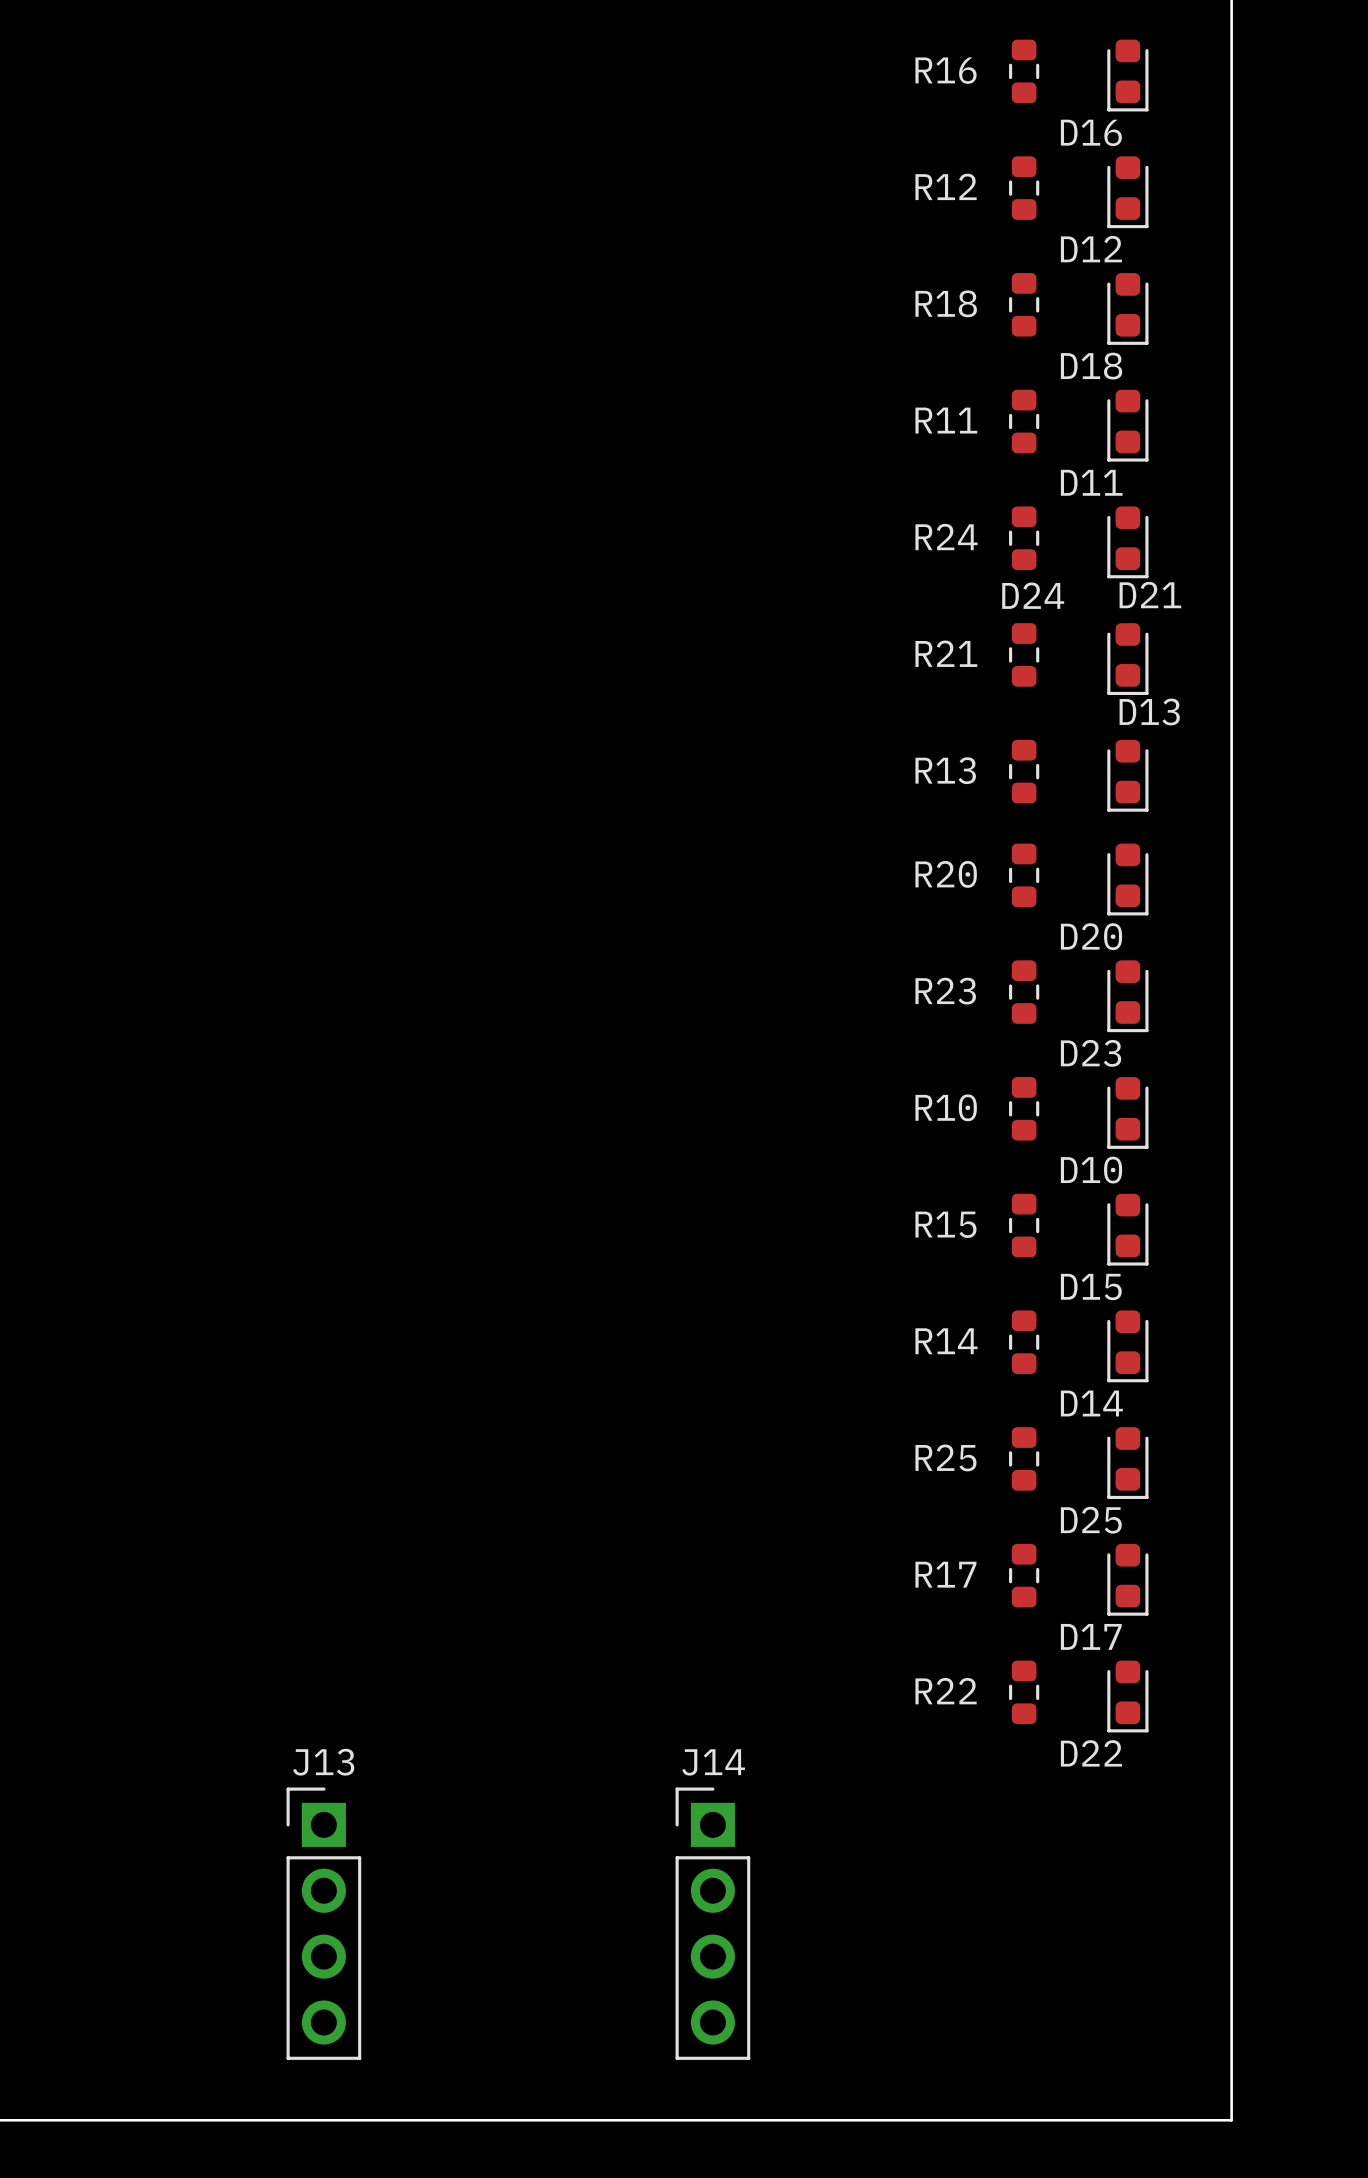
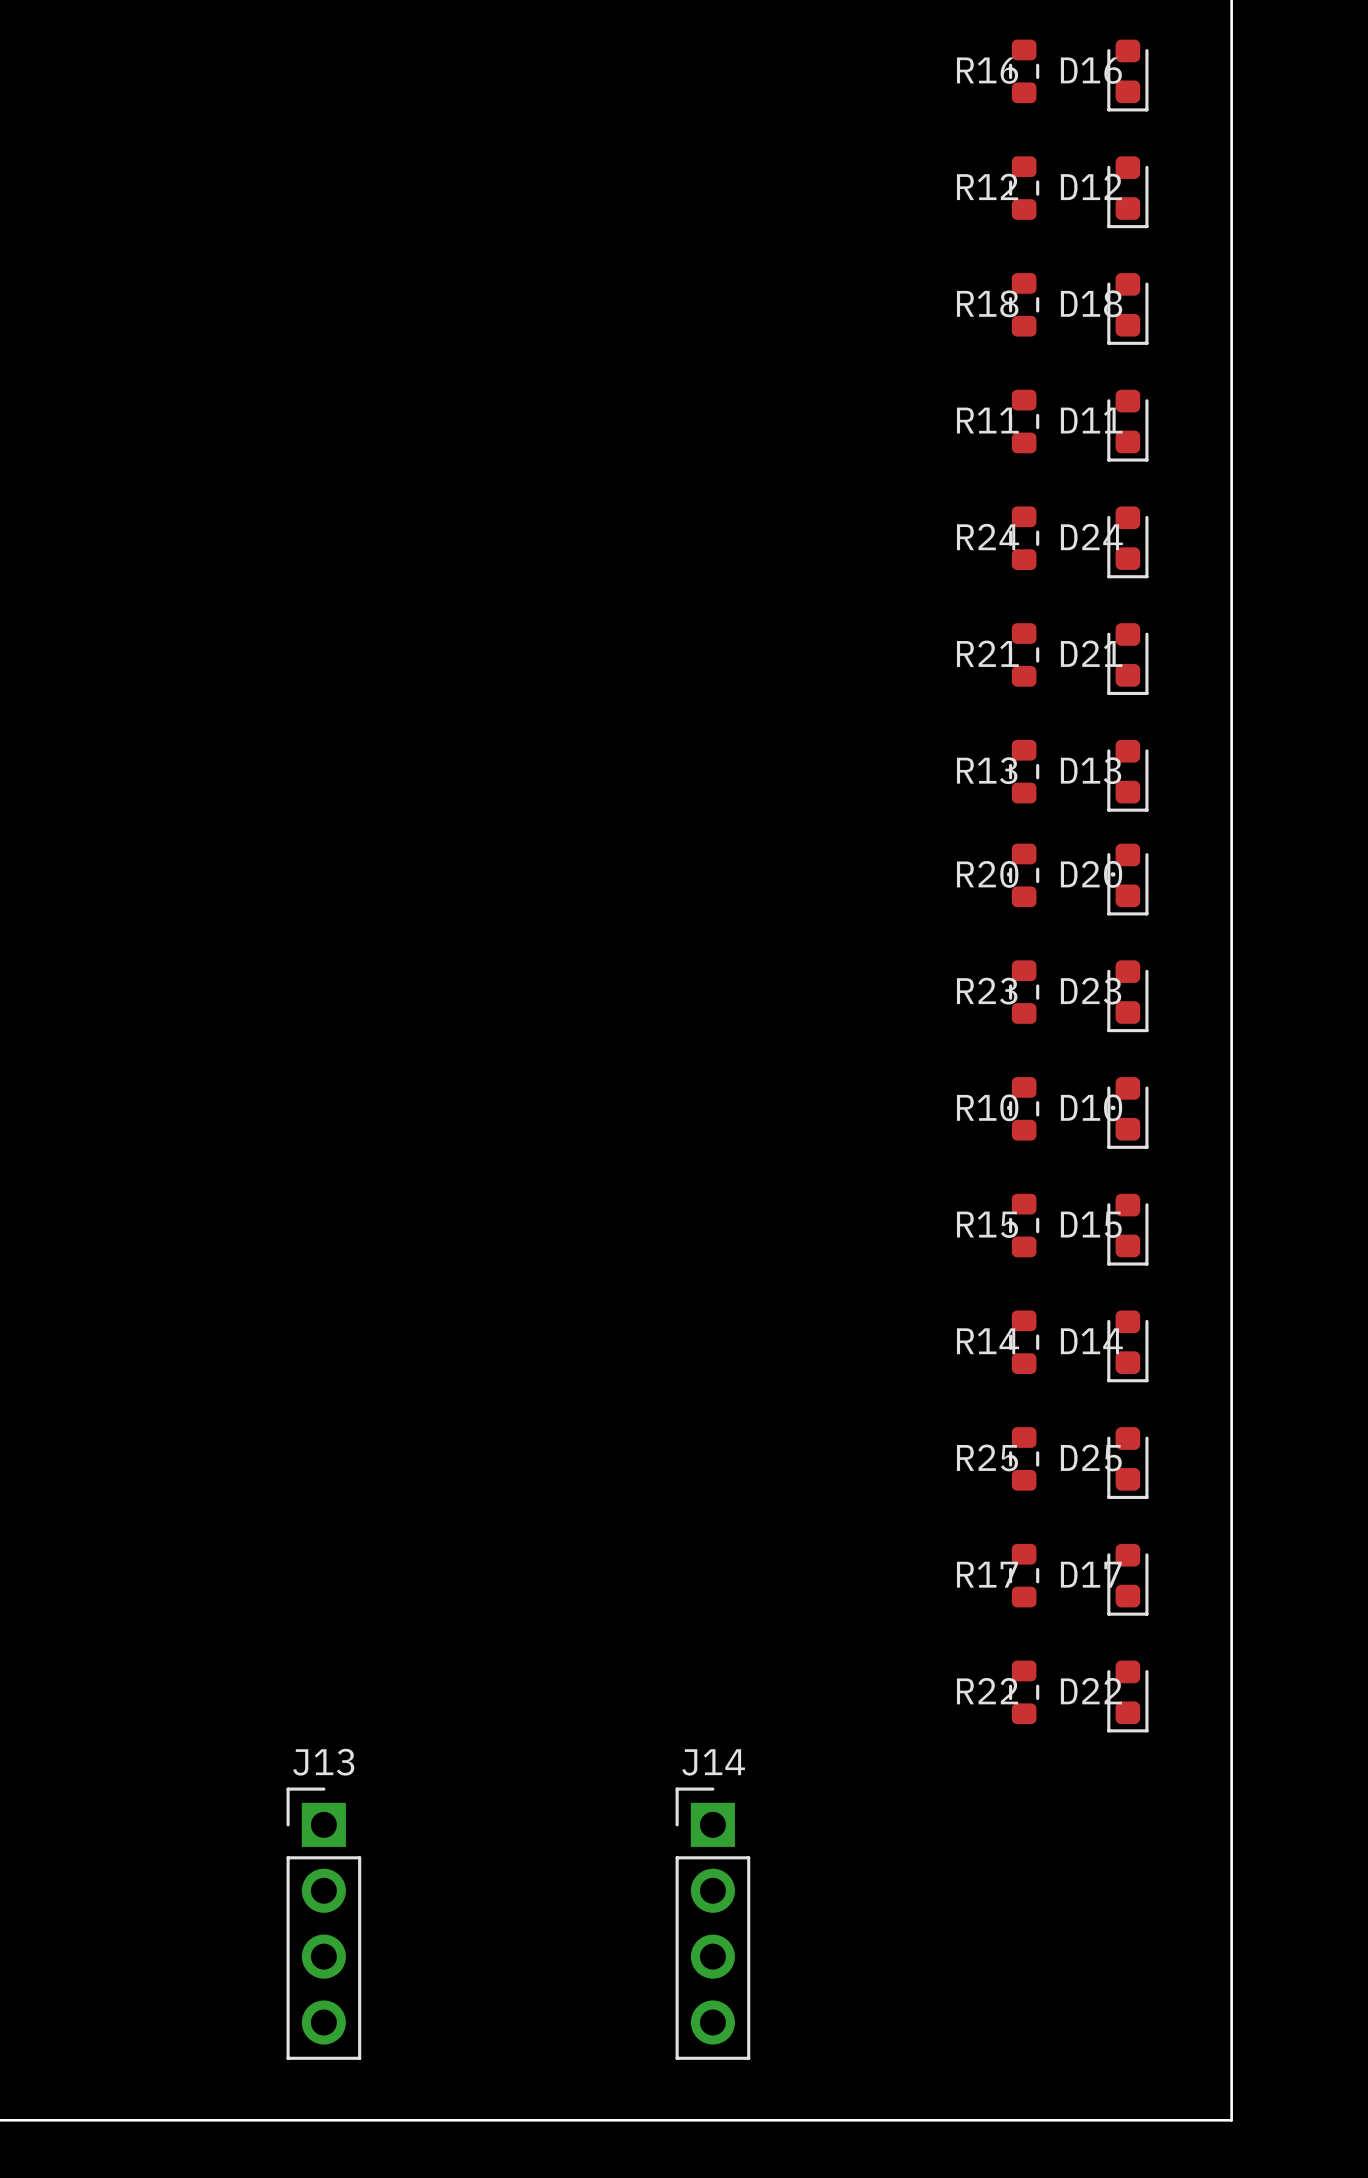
R16 name position: R16 (946, 70) -> R16 (987, 70)
D16 name position: D16 (1091, 132) -> D16 (1091, 70)
R12 name position: R12 (946, 186) -> R12 (987, 186)
D12 name position: D12 (1091, 249) -> D12 (1091, 186)
R18 name position: R18 (946, 303) -> R18 (987, 303)
D18 name position: D18 (1091, 366) -> D18 (1091, 303)
R11 name position: R11 (946, 420) -> R11 (987, 420)
D11 name position: D11 (1091, 482) -> D11 (1091, 420)
R24 name position: R24 (946, 537) -> R24 (988, 537)
D24 name position: D24 (1033, 595) -> D24 (1091, 537)
D21 name position: D21 (1150, 595) -> D21 (1091, 653)
R21 name position: R21 (946, 653) -> R21 (987, 653)
D13 name position: D13 (1149, 711) -> D13 (1091, 770)
R13 name position: R13 (945, 770) -> R13 (987, 770)
R20 name position: R20 (946, 874) -> R20 (987, 874)
D20 name position: D20 (1091, 936) -> D20 (1091, 874)
R23 name position: R23 (945, 991) -> R23 (987, 991)
D23 name position: D23 (1091, 1053) -> D23 (1091, 991)
R10 name position: R10 (946, 1107) -> R10 (987, 1107)
D10 name position: D10 (1091, 1170) -> D10 (1091, 1107)
R15 name position: R15 (945, 1224) -> R15 (987, 1224)
D15 name position: D15 (1091, 1287) -> D15 (1091, 1224)
R14 name position: R14 (946, 1341) -> R14 (988, 1341)
D14 name position: D14 (1091, 1403) -> D14 (1091, 1341)
R25 name position: R25 (945, 1457) -> R25 (987, 1457)
D25 name position: D25 (1091, 1520) -> D25 (1091, 1457)
R17 name position: R17 (945, 1574) -> R17 (987, 1574)
D17 name position: D17 (1091, 1636) -> D17 (1091, 1574)
R22 name position: R22 (946, 1691) -> R22 (987, 1691)
D22 name position: D22 (1091, 1753) -> D22 (1091, 1691)

